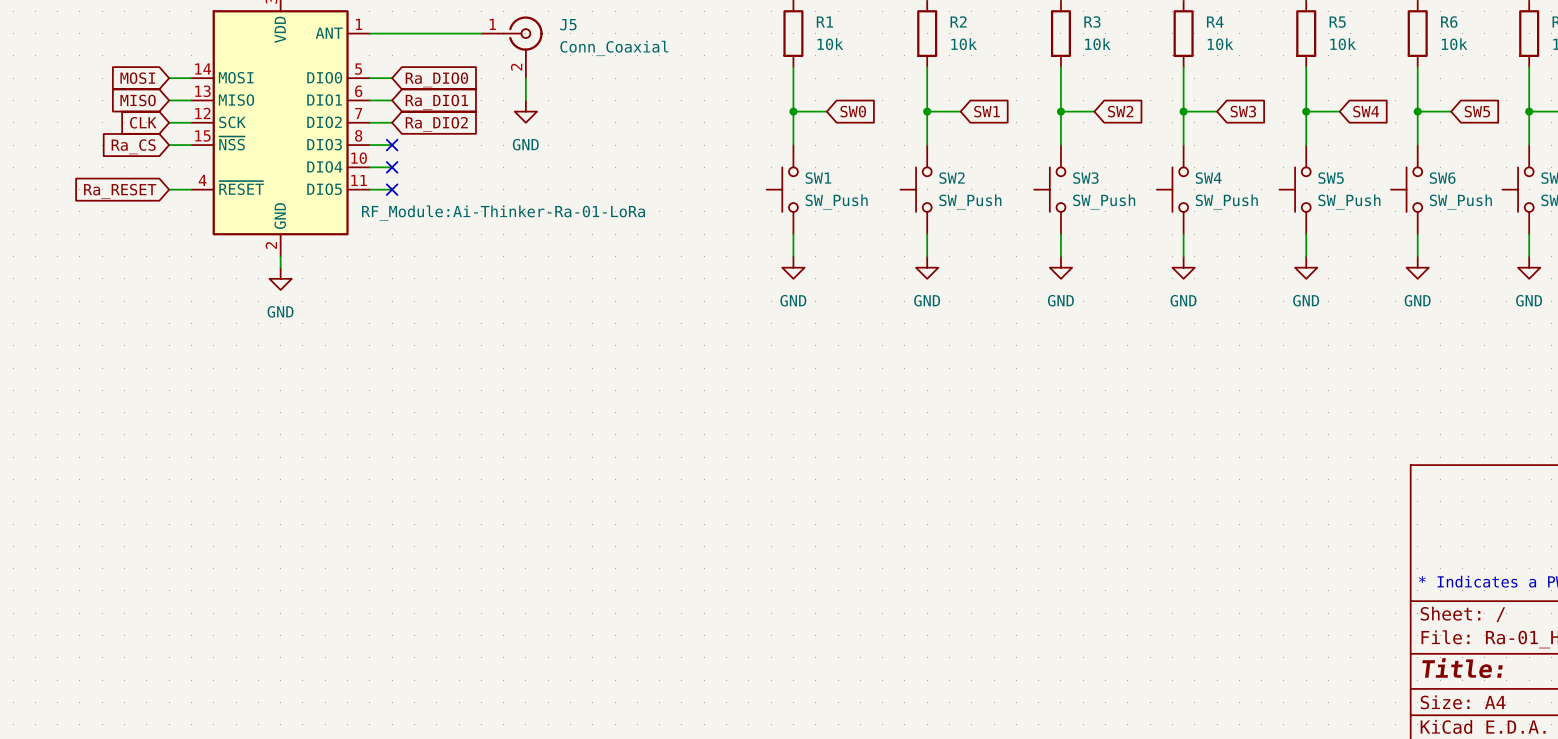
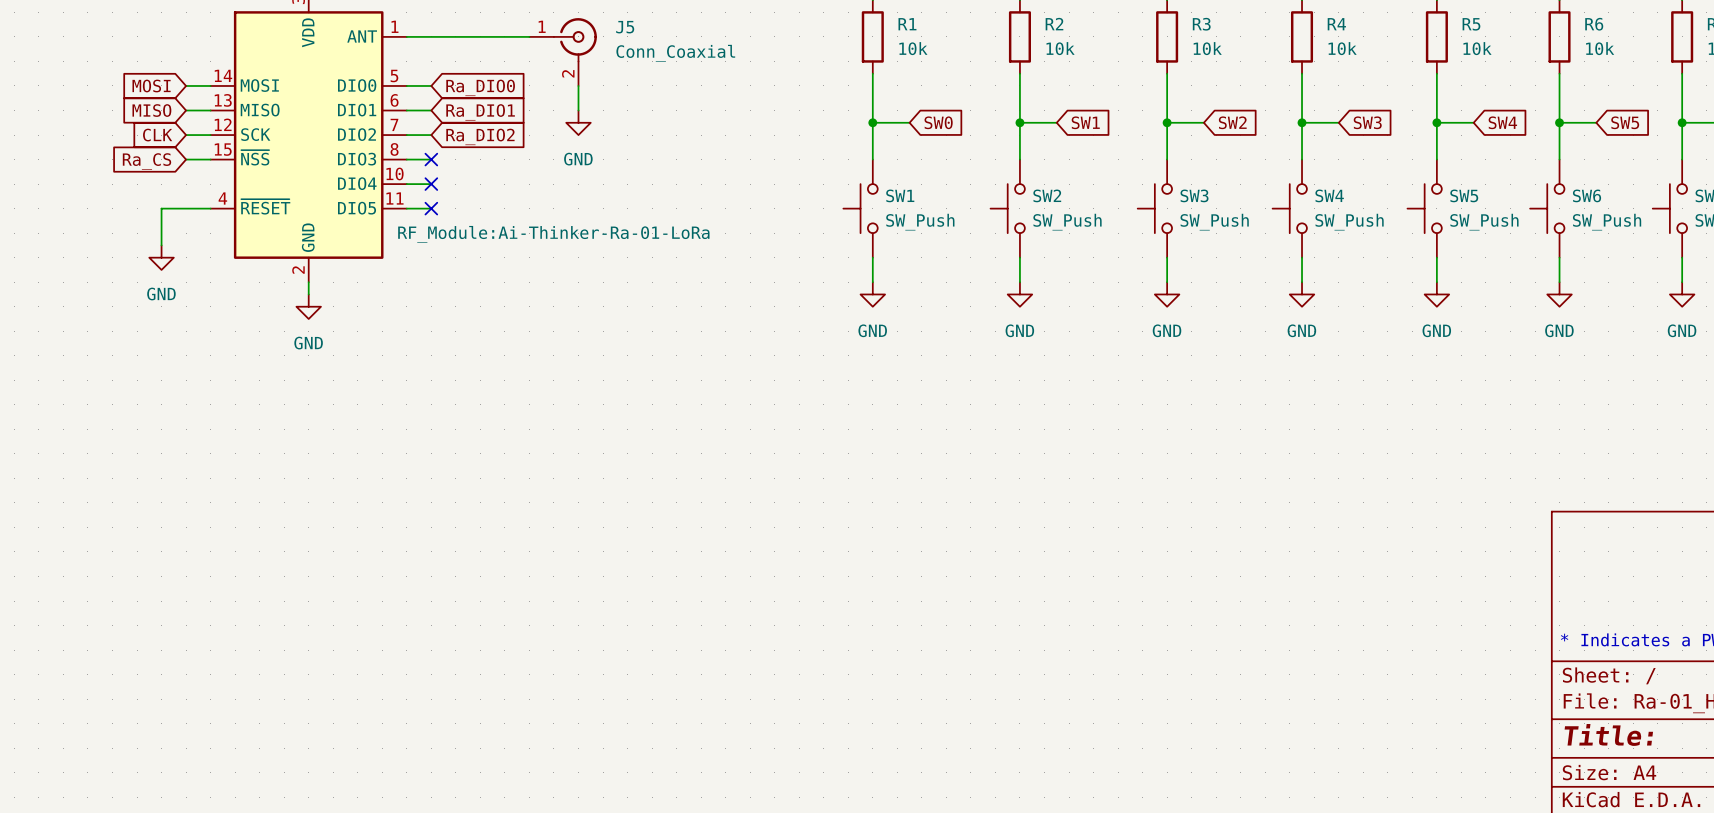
wire: none -> (186, 208) (161, 208) (161, 245)
global label: Ra_RESET (120, 191) -> none
power symbol: none -> GND (161, 257)

